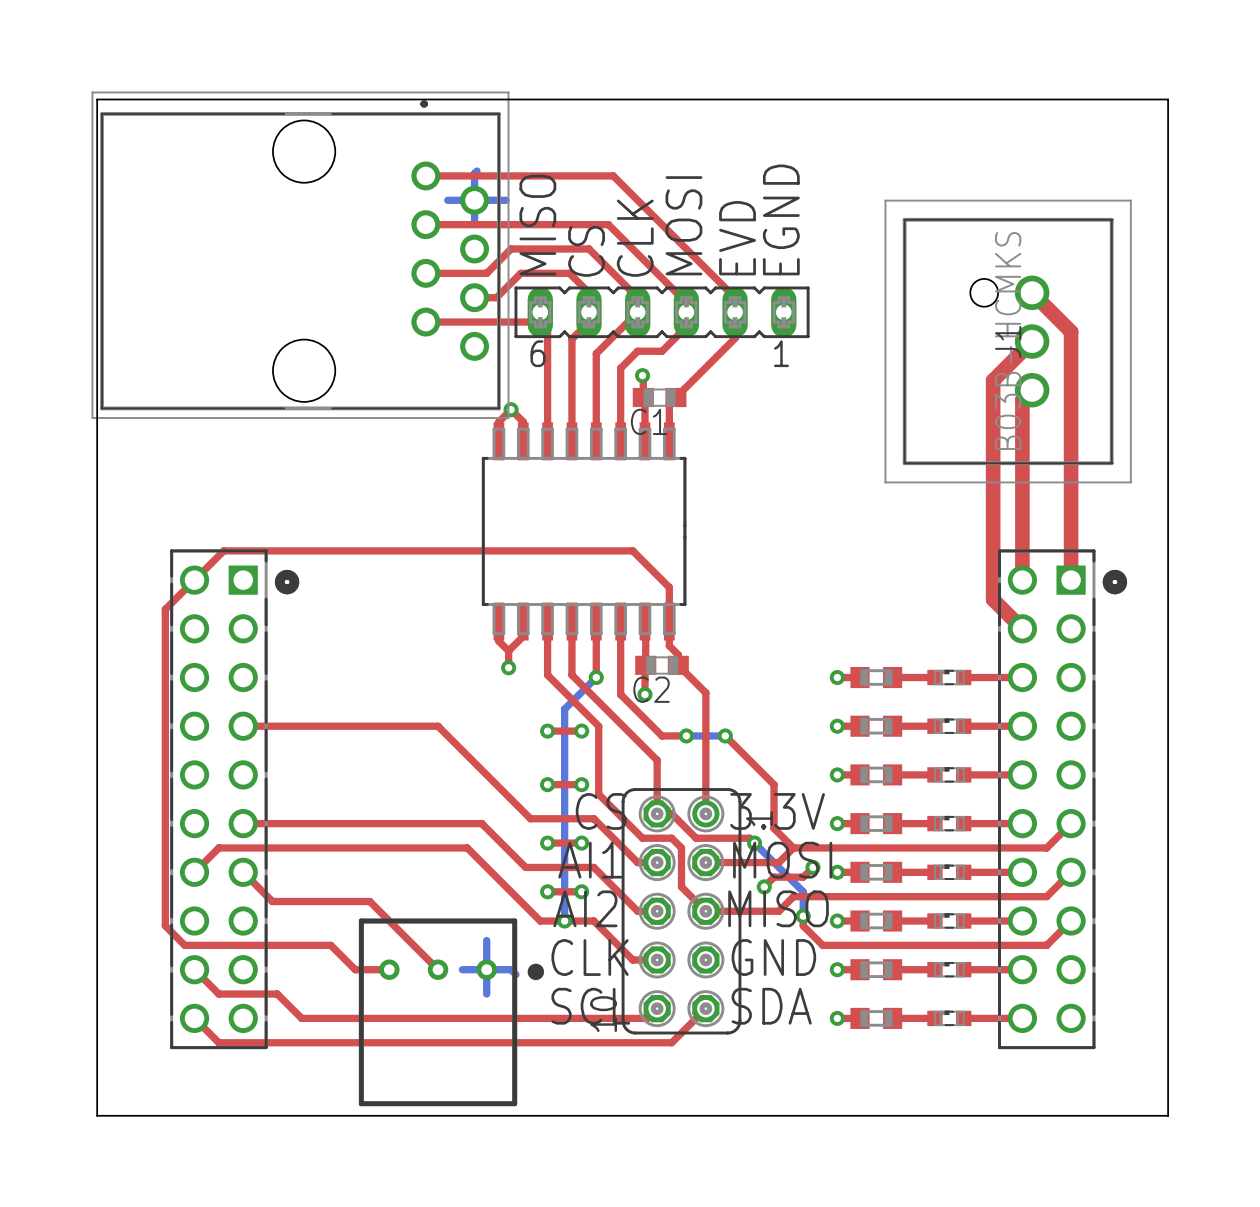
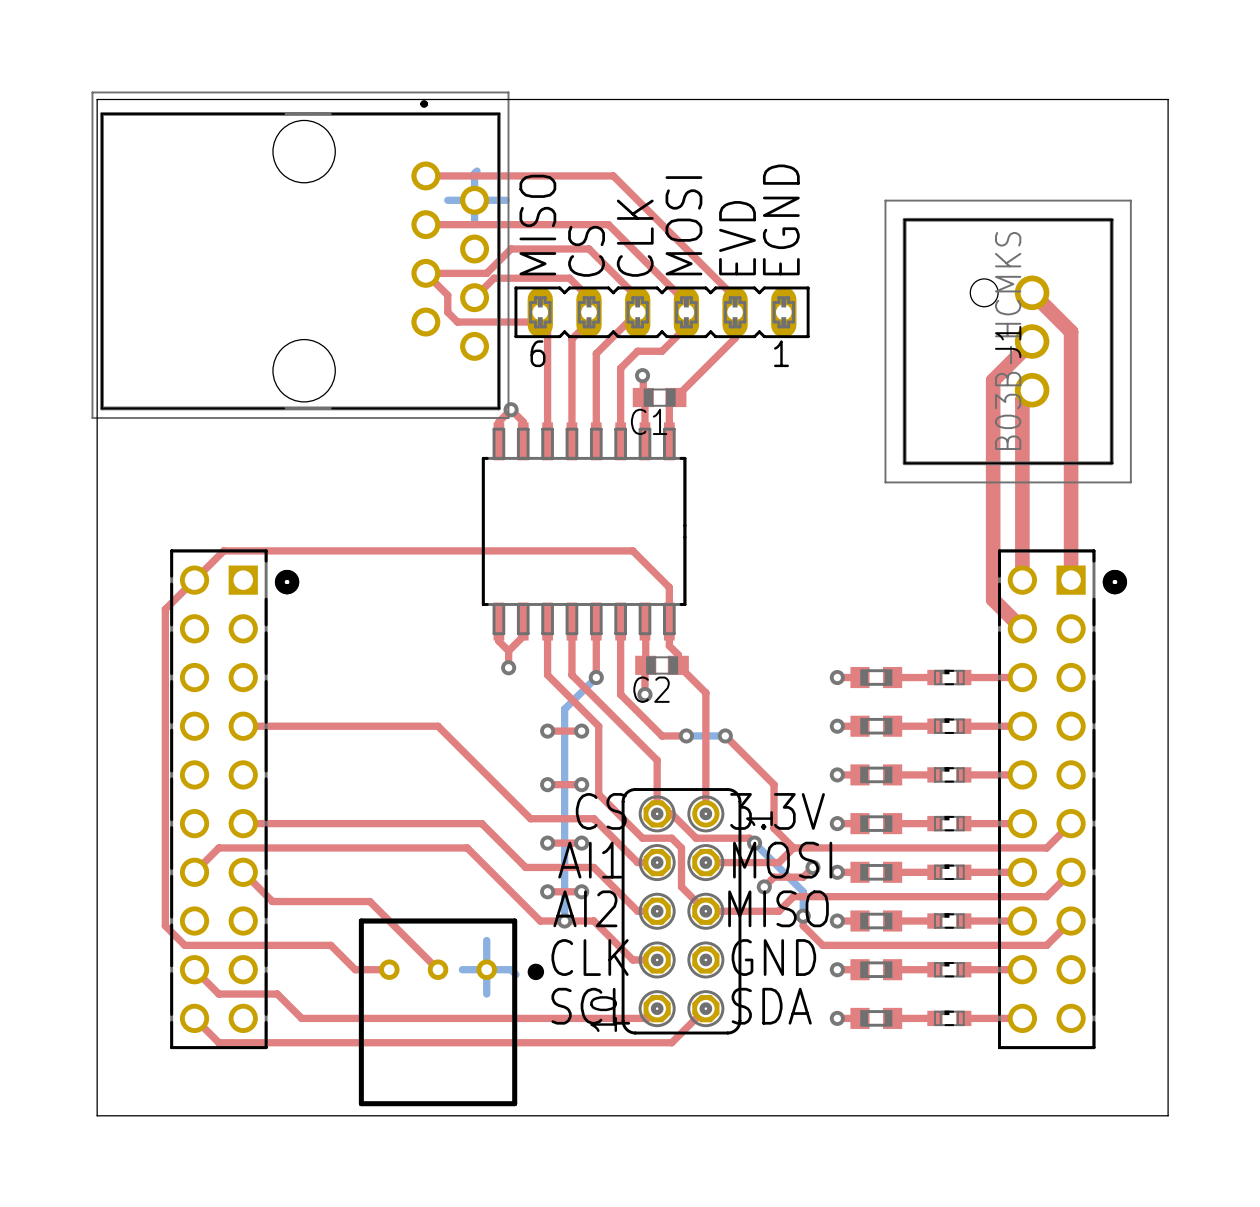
top track: (474, 297) (496, 297) (520, 273) (569, 273) (588, 292) (588, 297) -> (474, 297) (494, 278) (569, 278) (588, 297)
top track: (425, 322) (457, 322) -> (425, 273) (447, 295) (447, 312) (457, 322)

